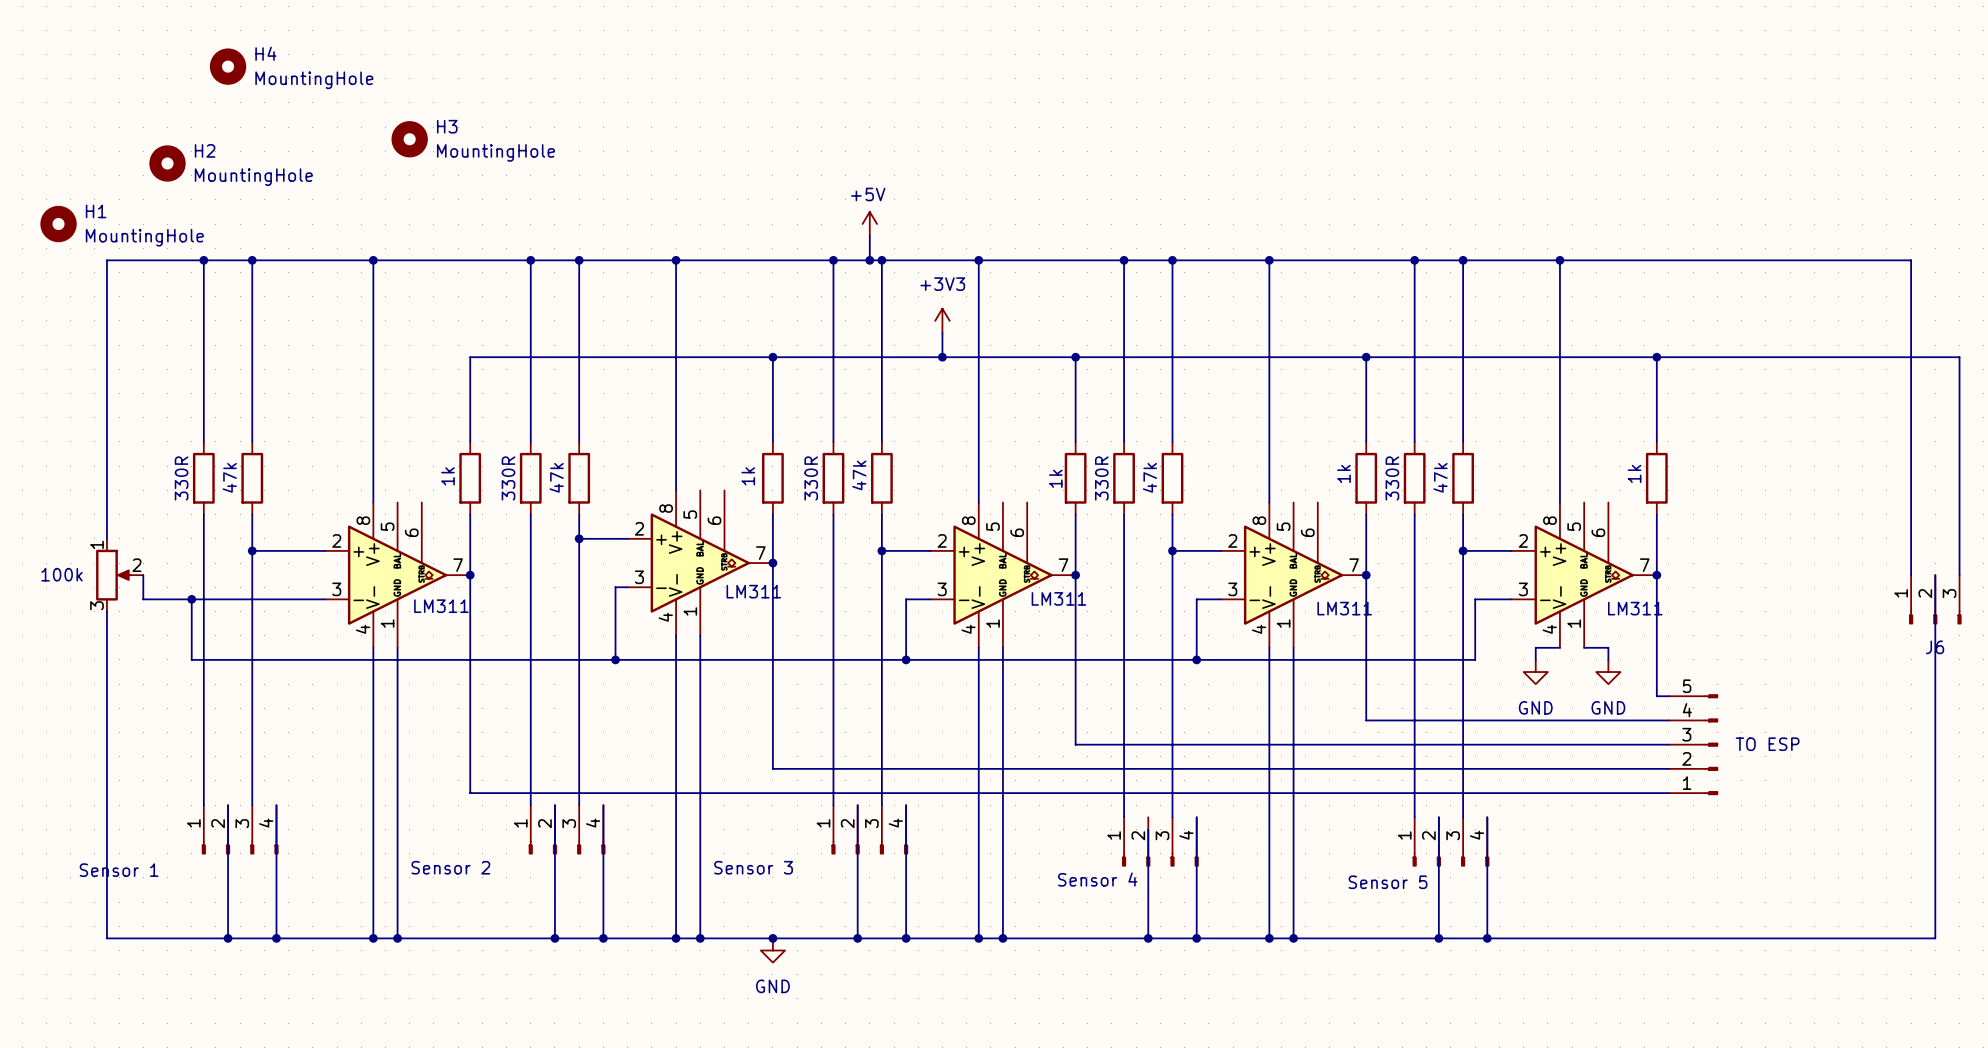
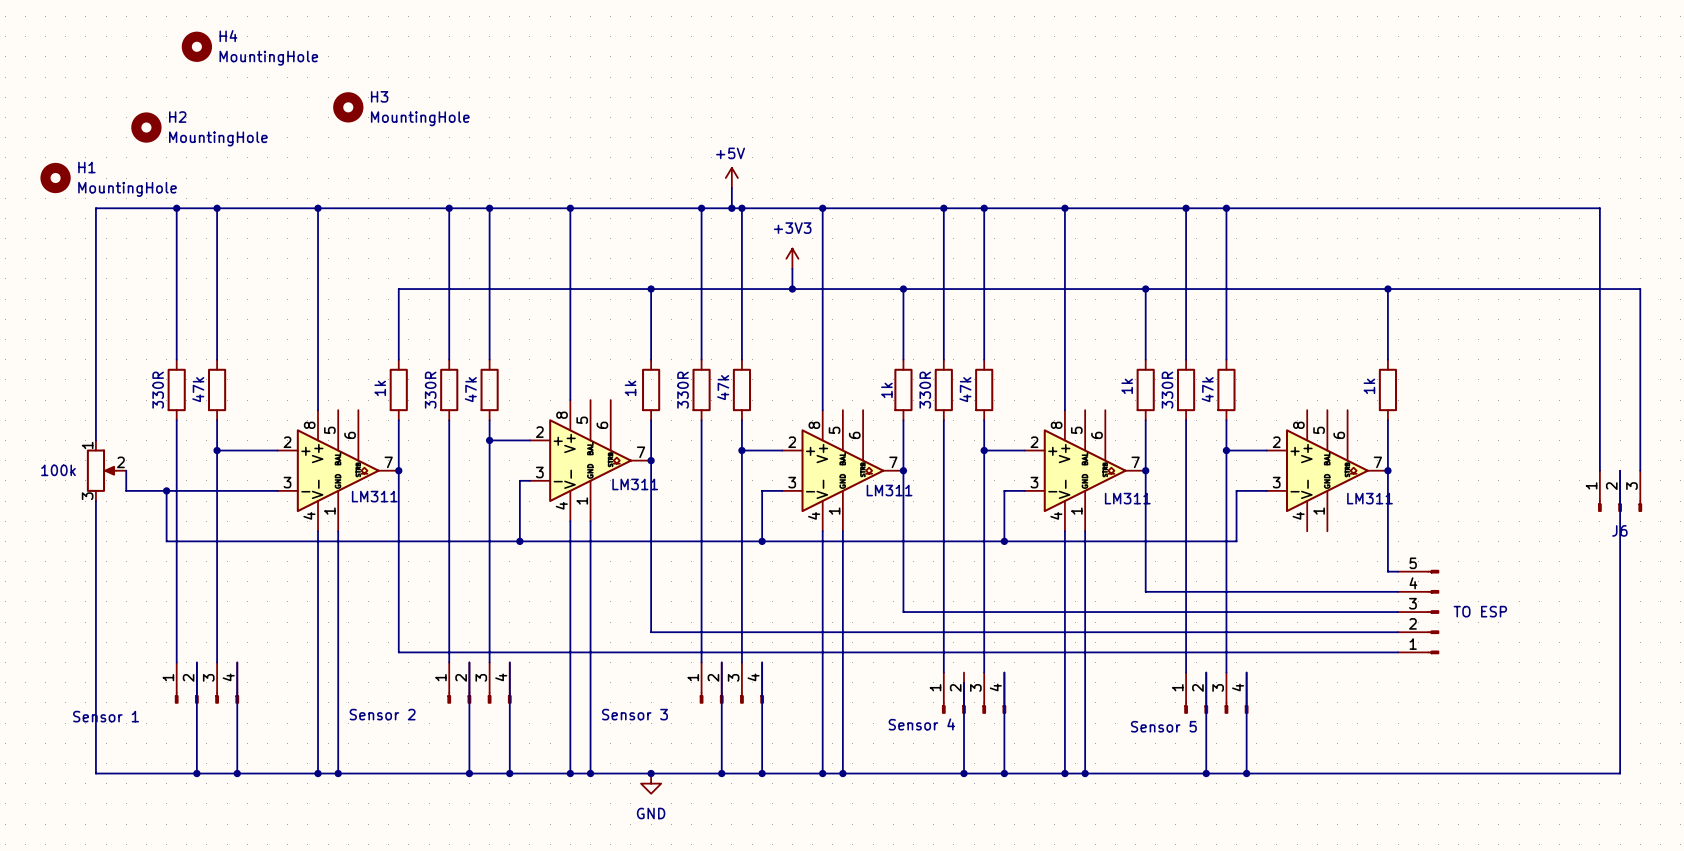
wire: (1559, 260) (1559, 502) -> none
junction: (1559, 260) -> none
wire: (1559, 647) (1535, 647) (1535, 659) -> none
wire: (1584, 647) (1608, 647) (1608, 659) -> none
power symbol: GND (1535, 672) -> none
power symbol: GND (1608, 672) -> none

